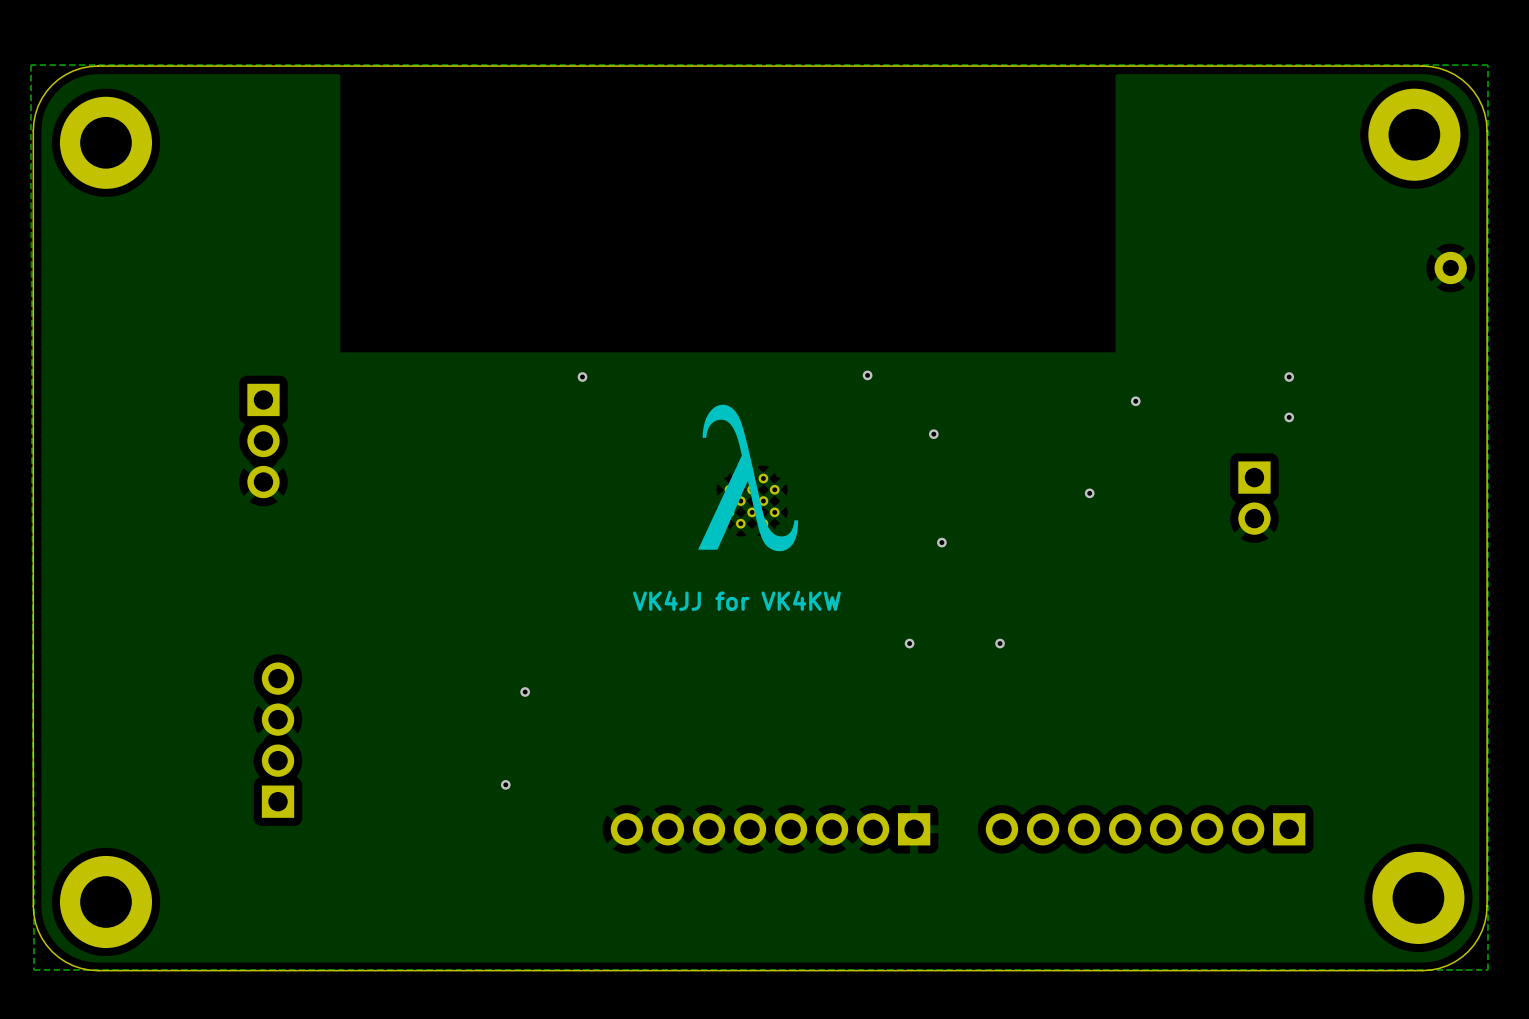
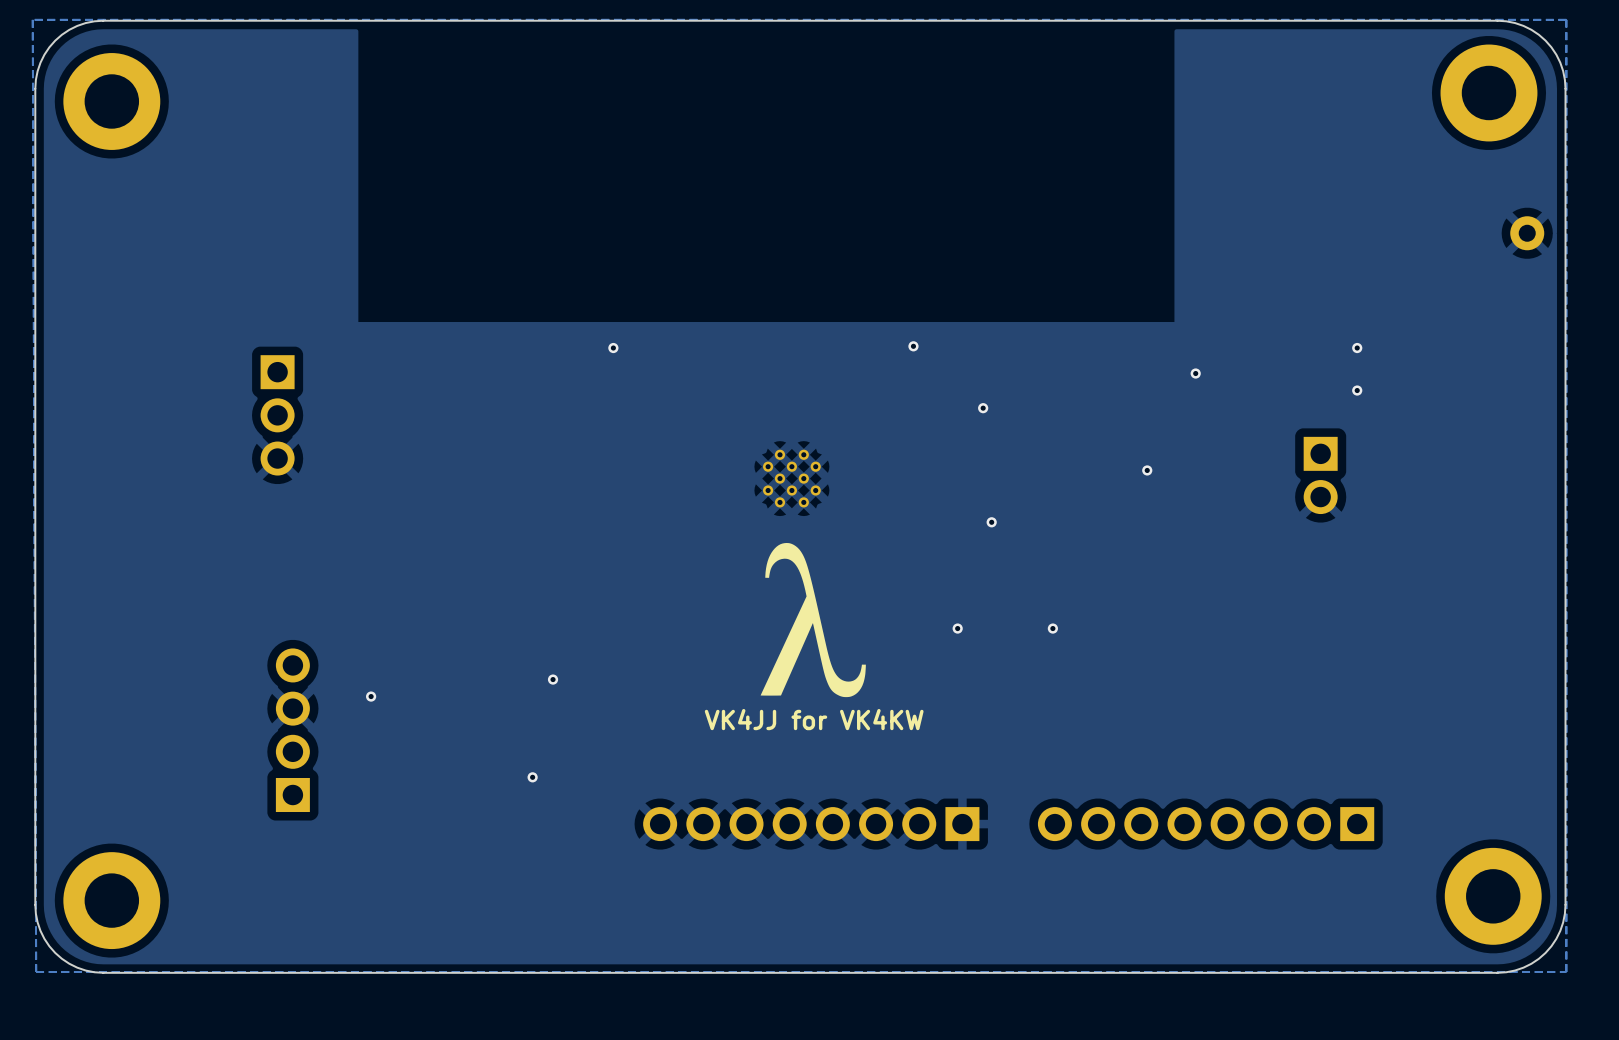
drawing position: (748, 477) -> (813, 620)
text position: VK4JJ for VK4KW (736, 600) -> VK4JJ for VK4KW (814, 719)
via: none -> (371, 696)

